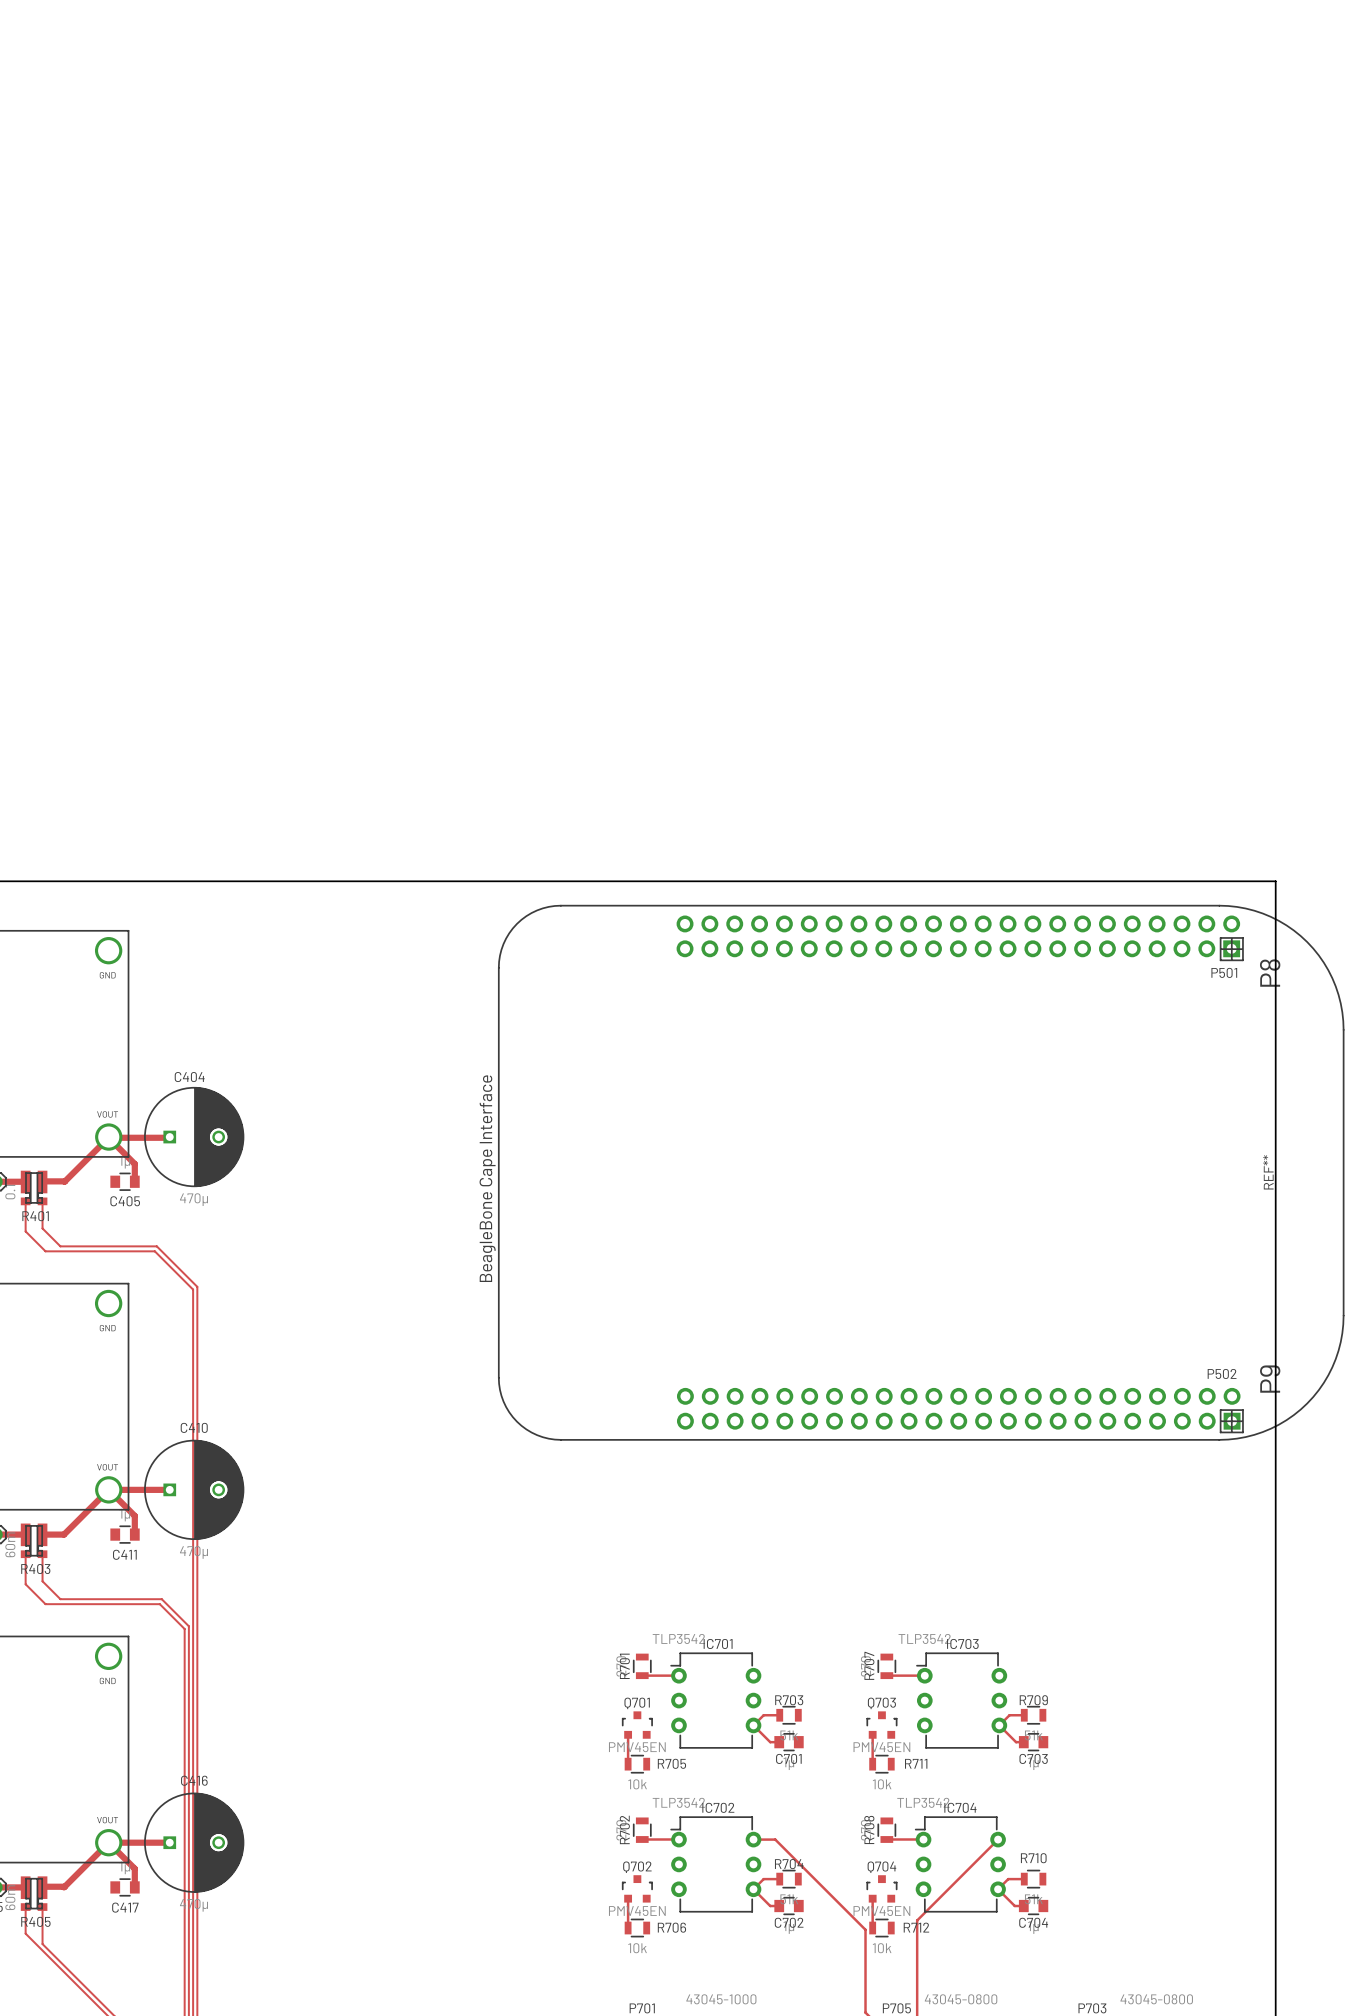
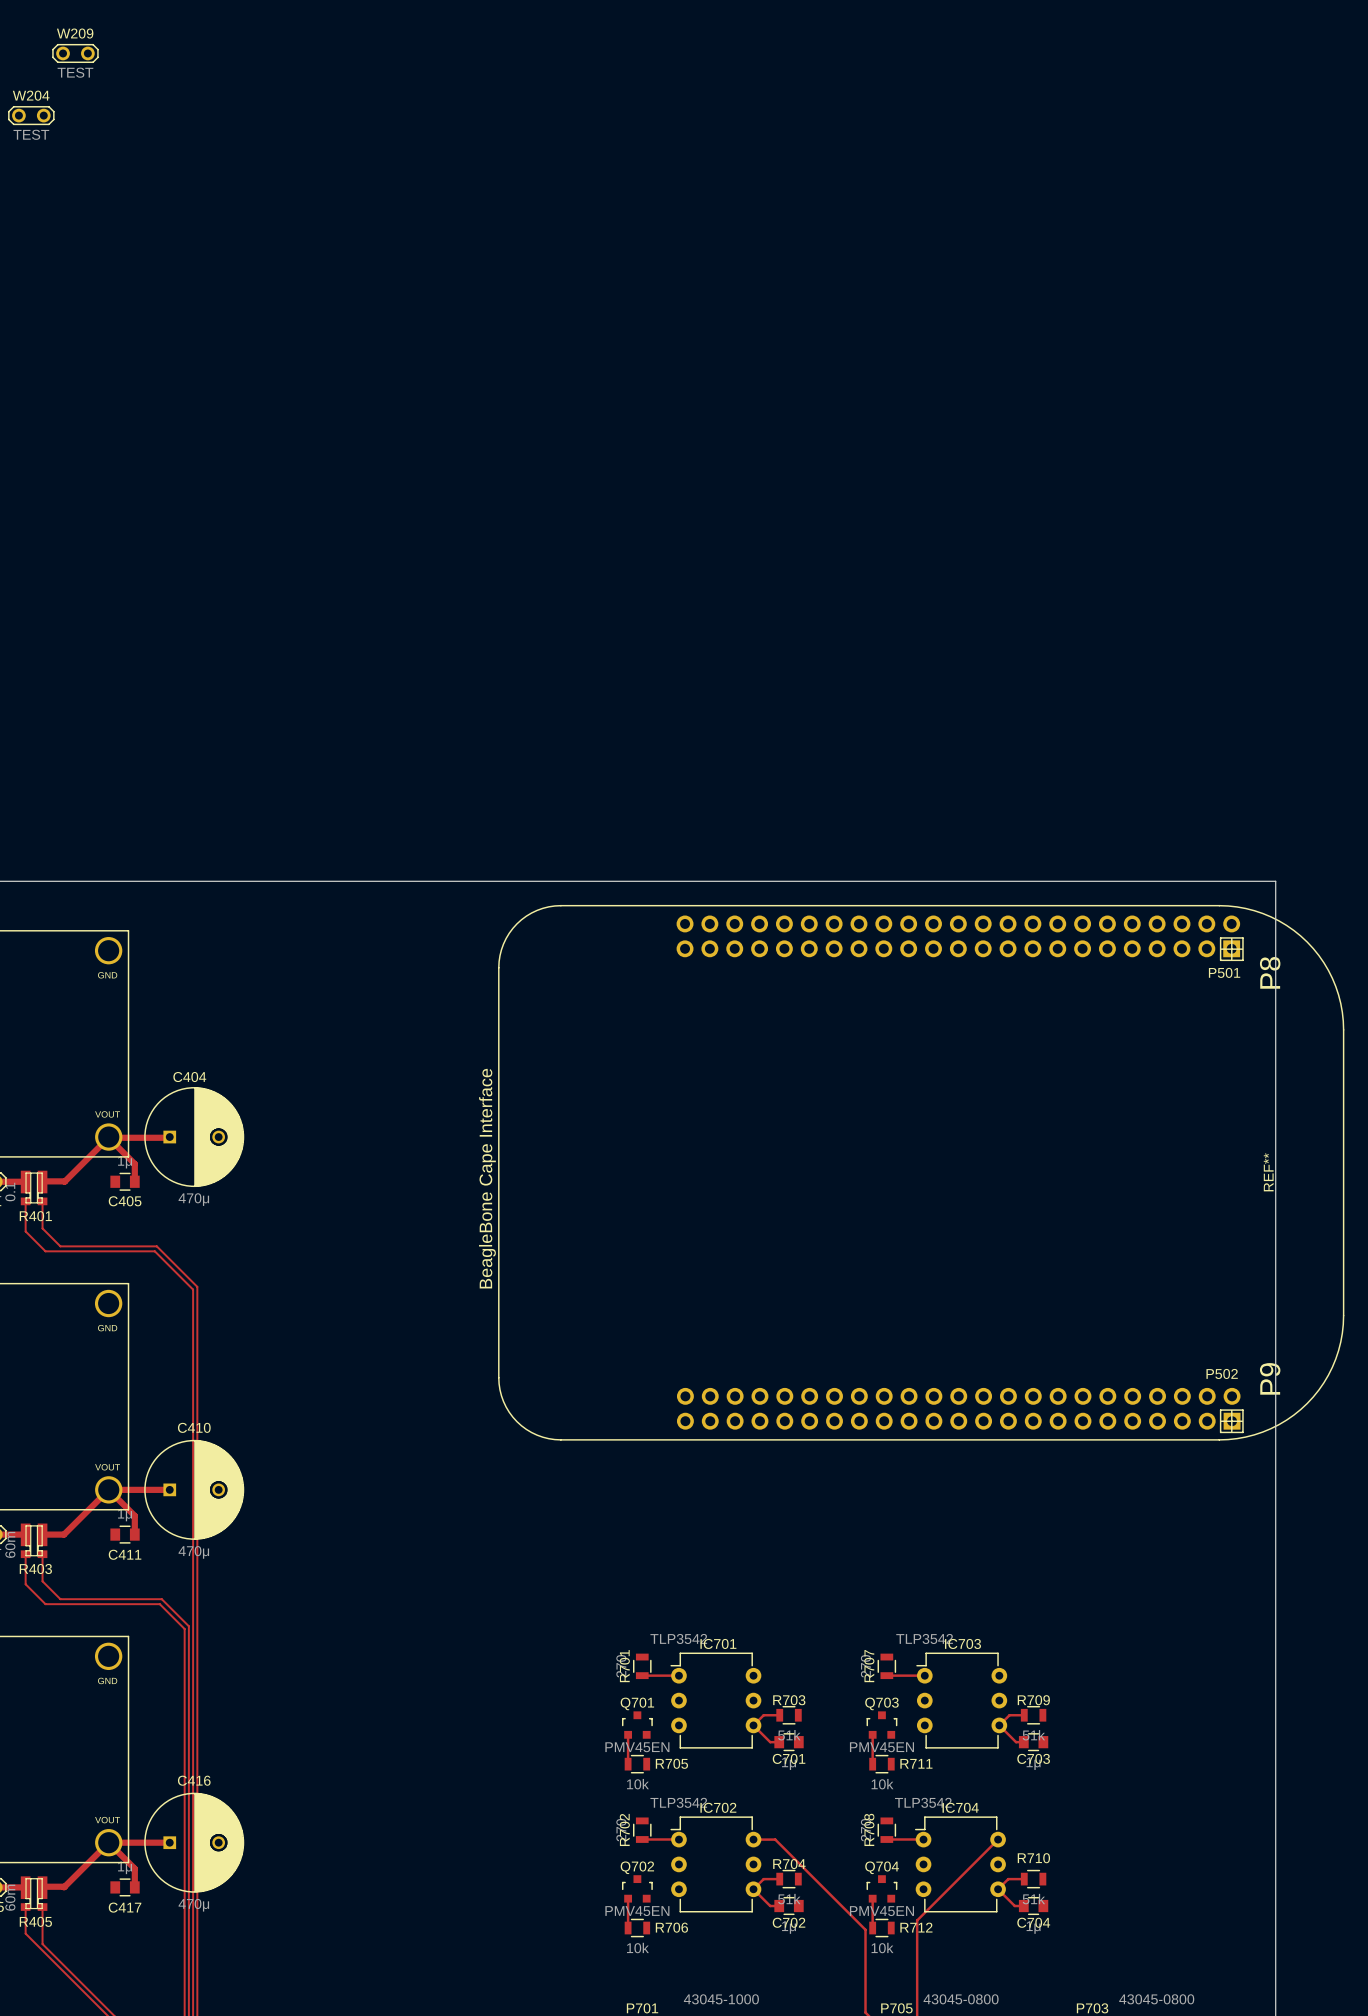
W209: none -> TEST (75, 53)
W204: none -> TEST (31, 115)

